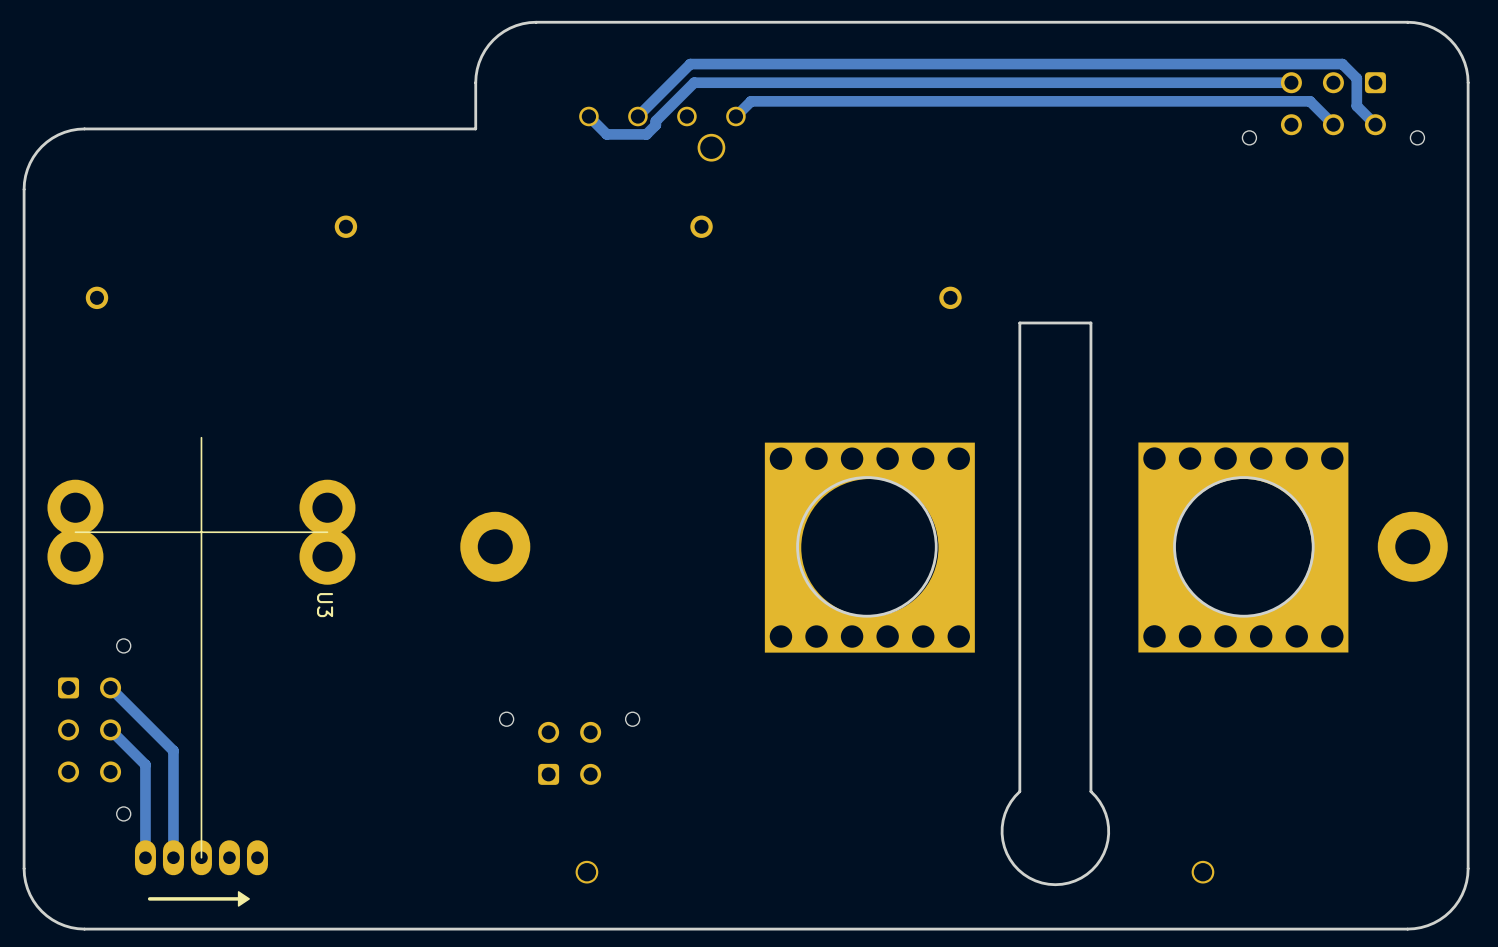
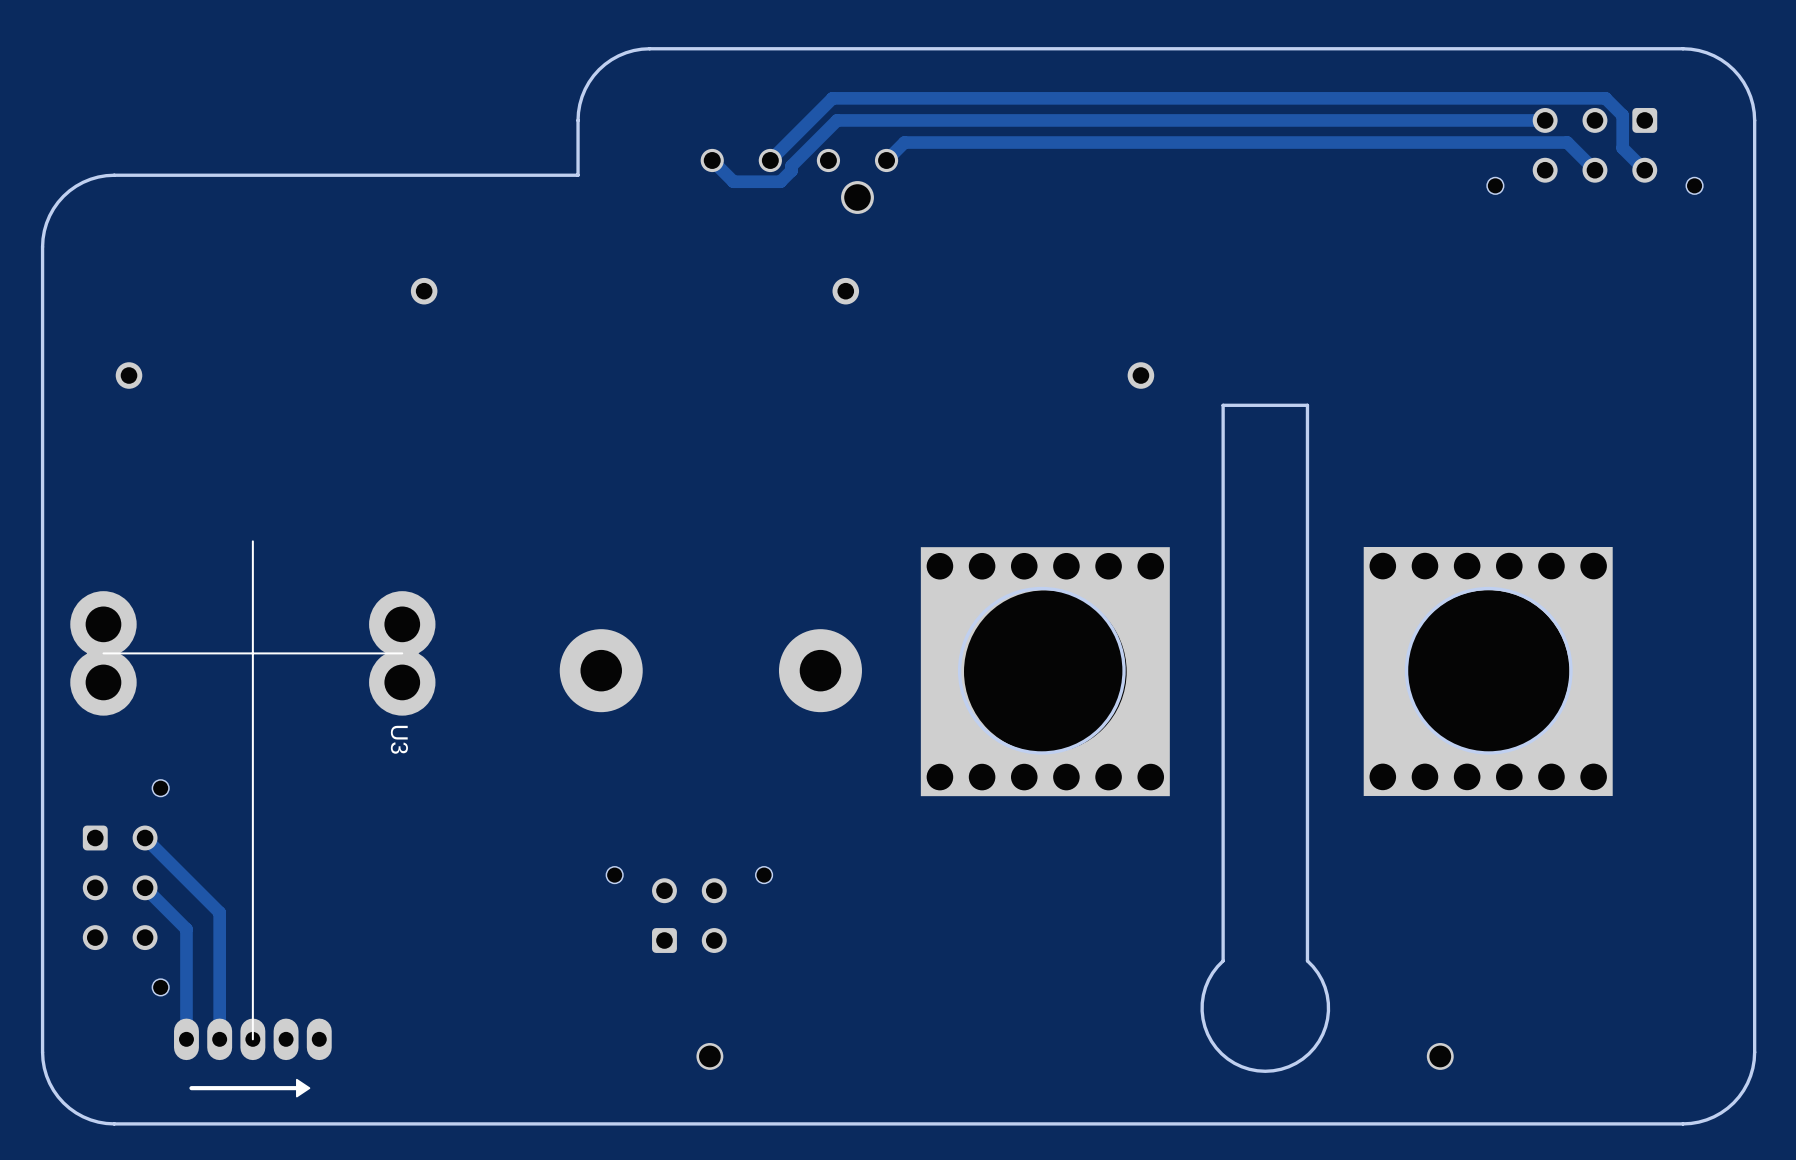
part: none -> (820, 670)
part: (1412, 546) -> none

